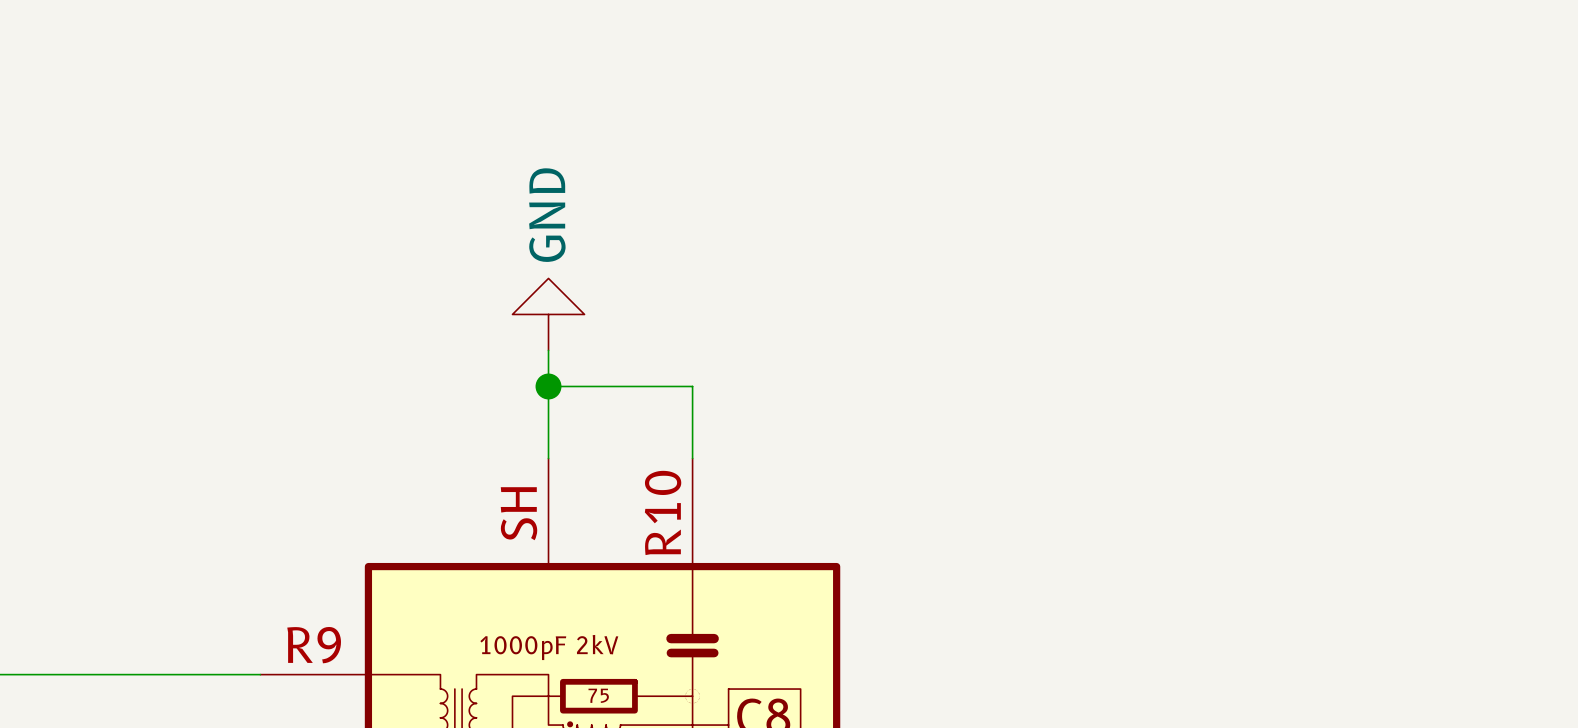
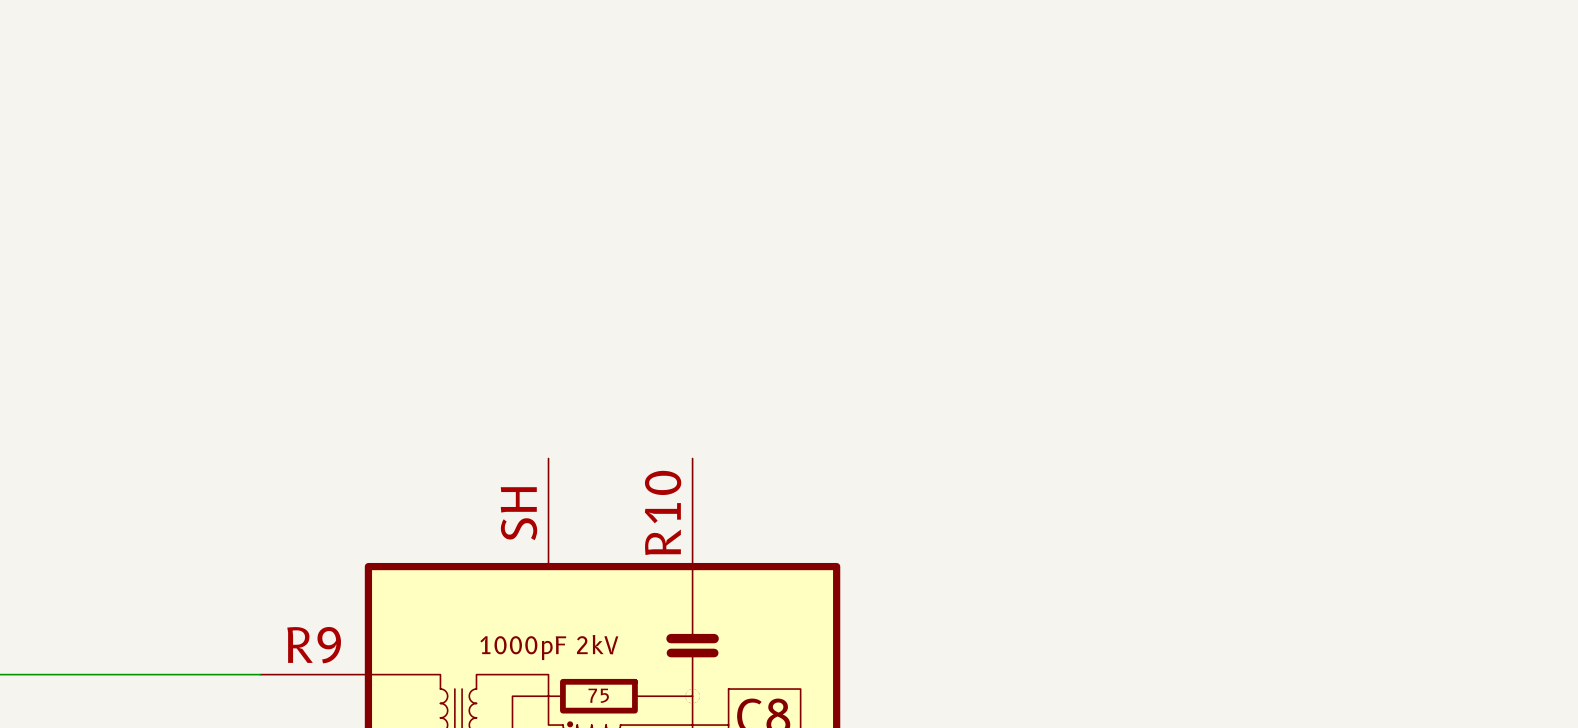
power symbol: GND (548, 314) -> none
wire: (548, 350) (548, 458) -> none
wire: (548, 386) (692, 386) (692, 458) -> none
junction: (548, 386) -> none

